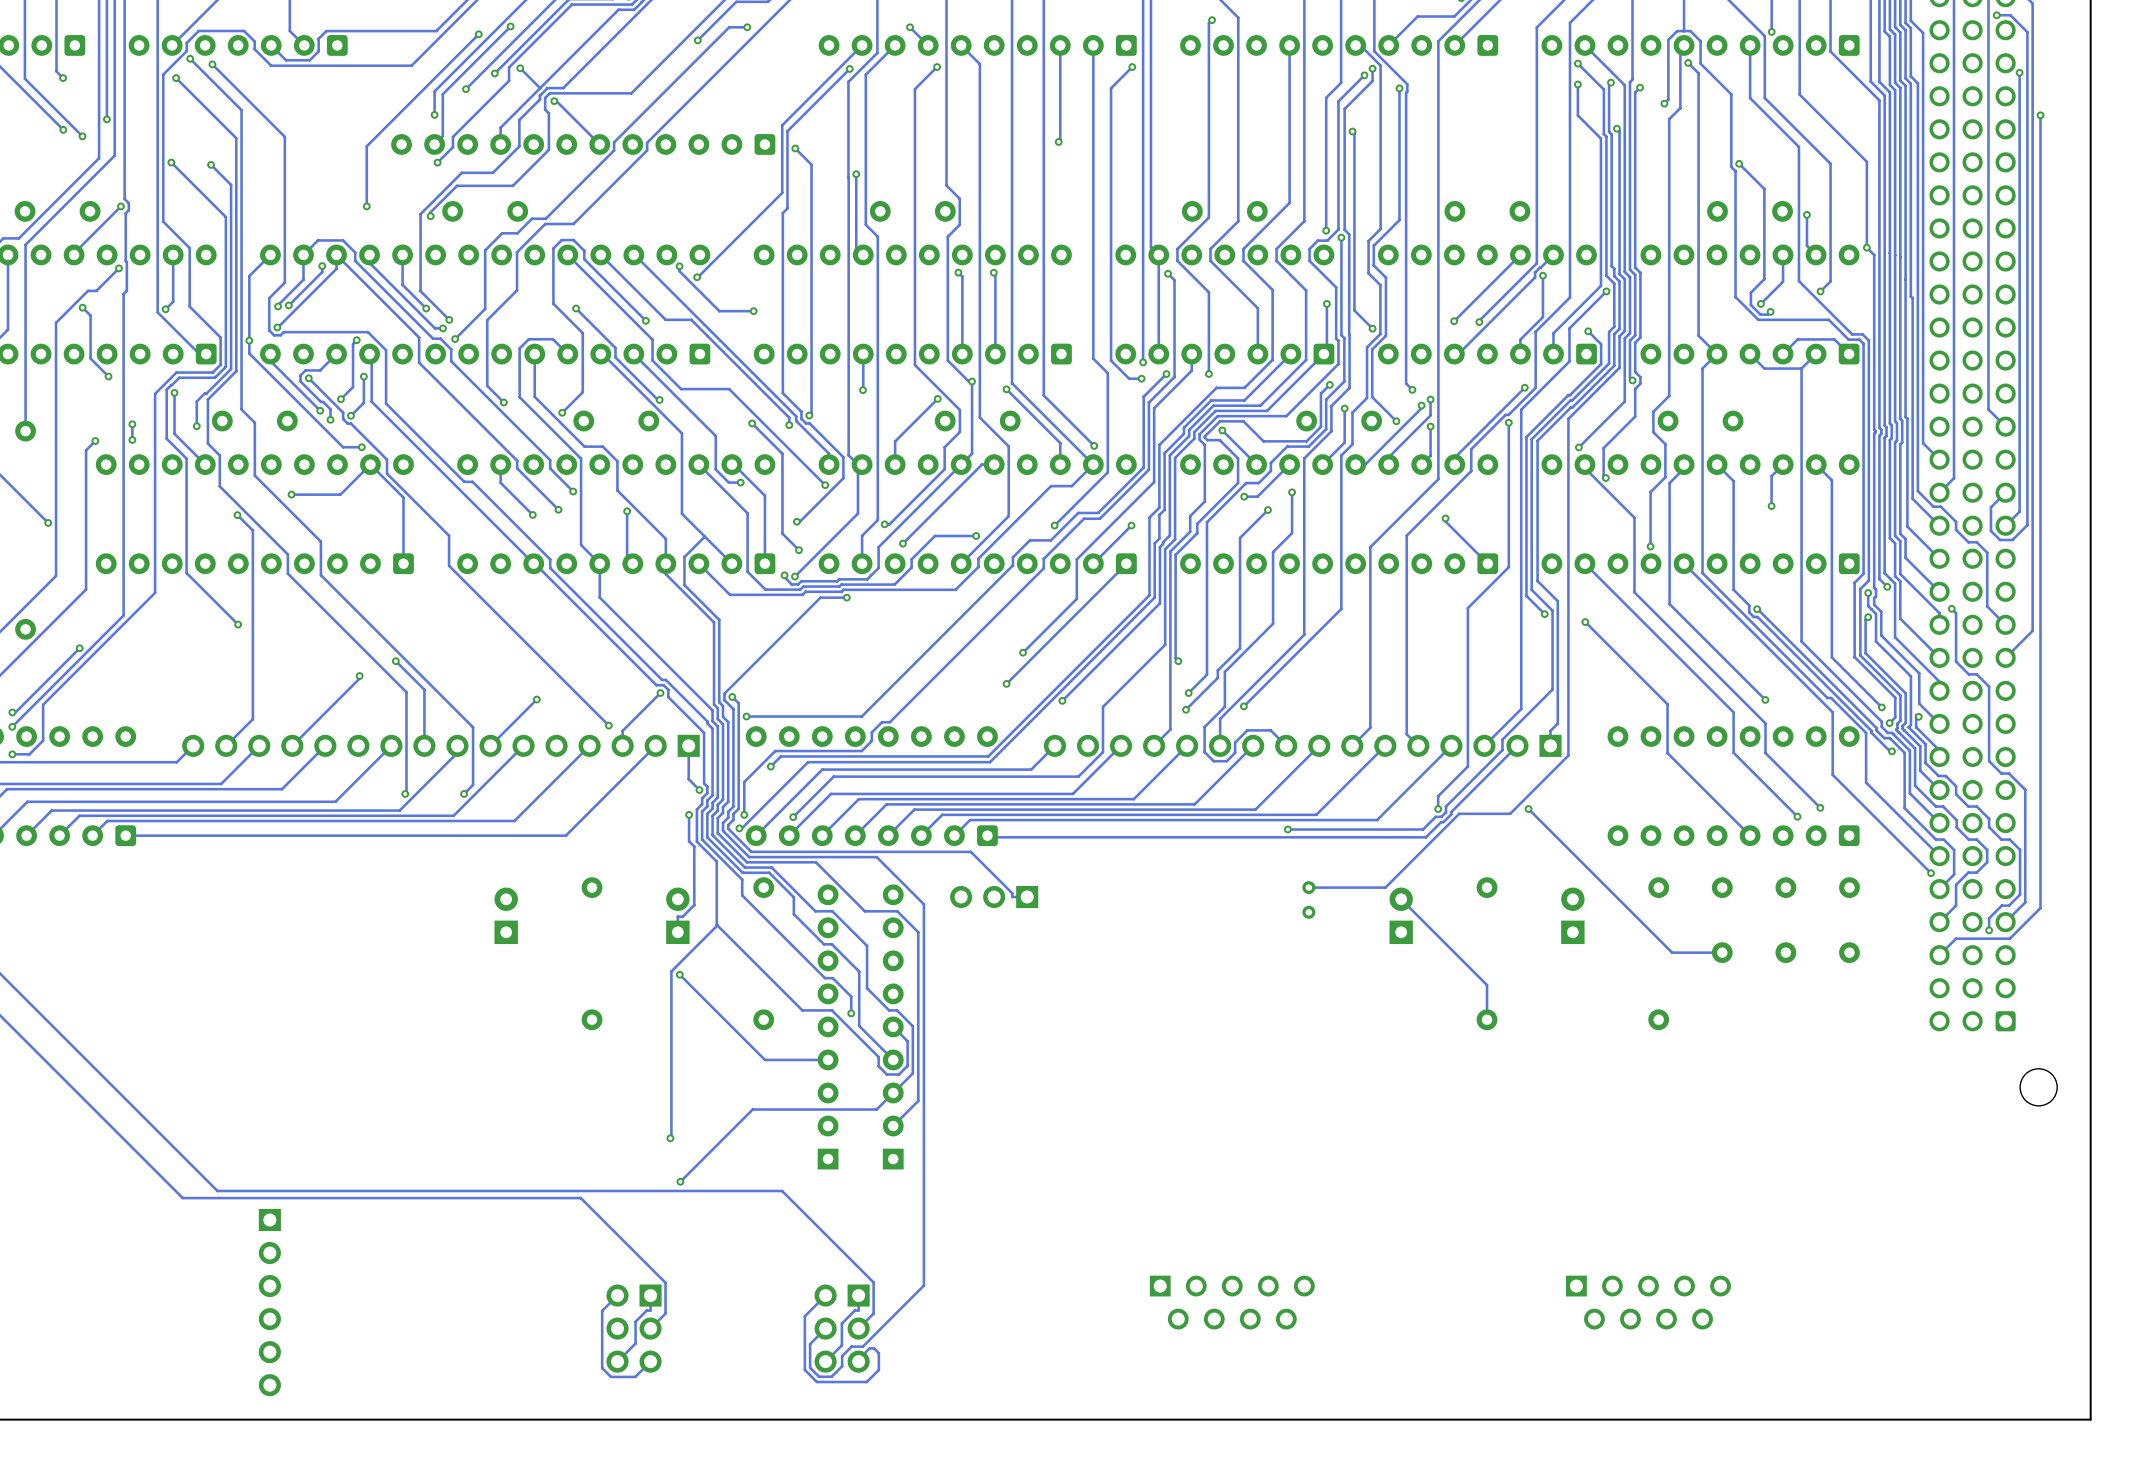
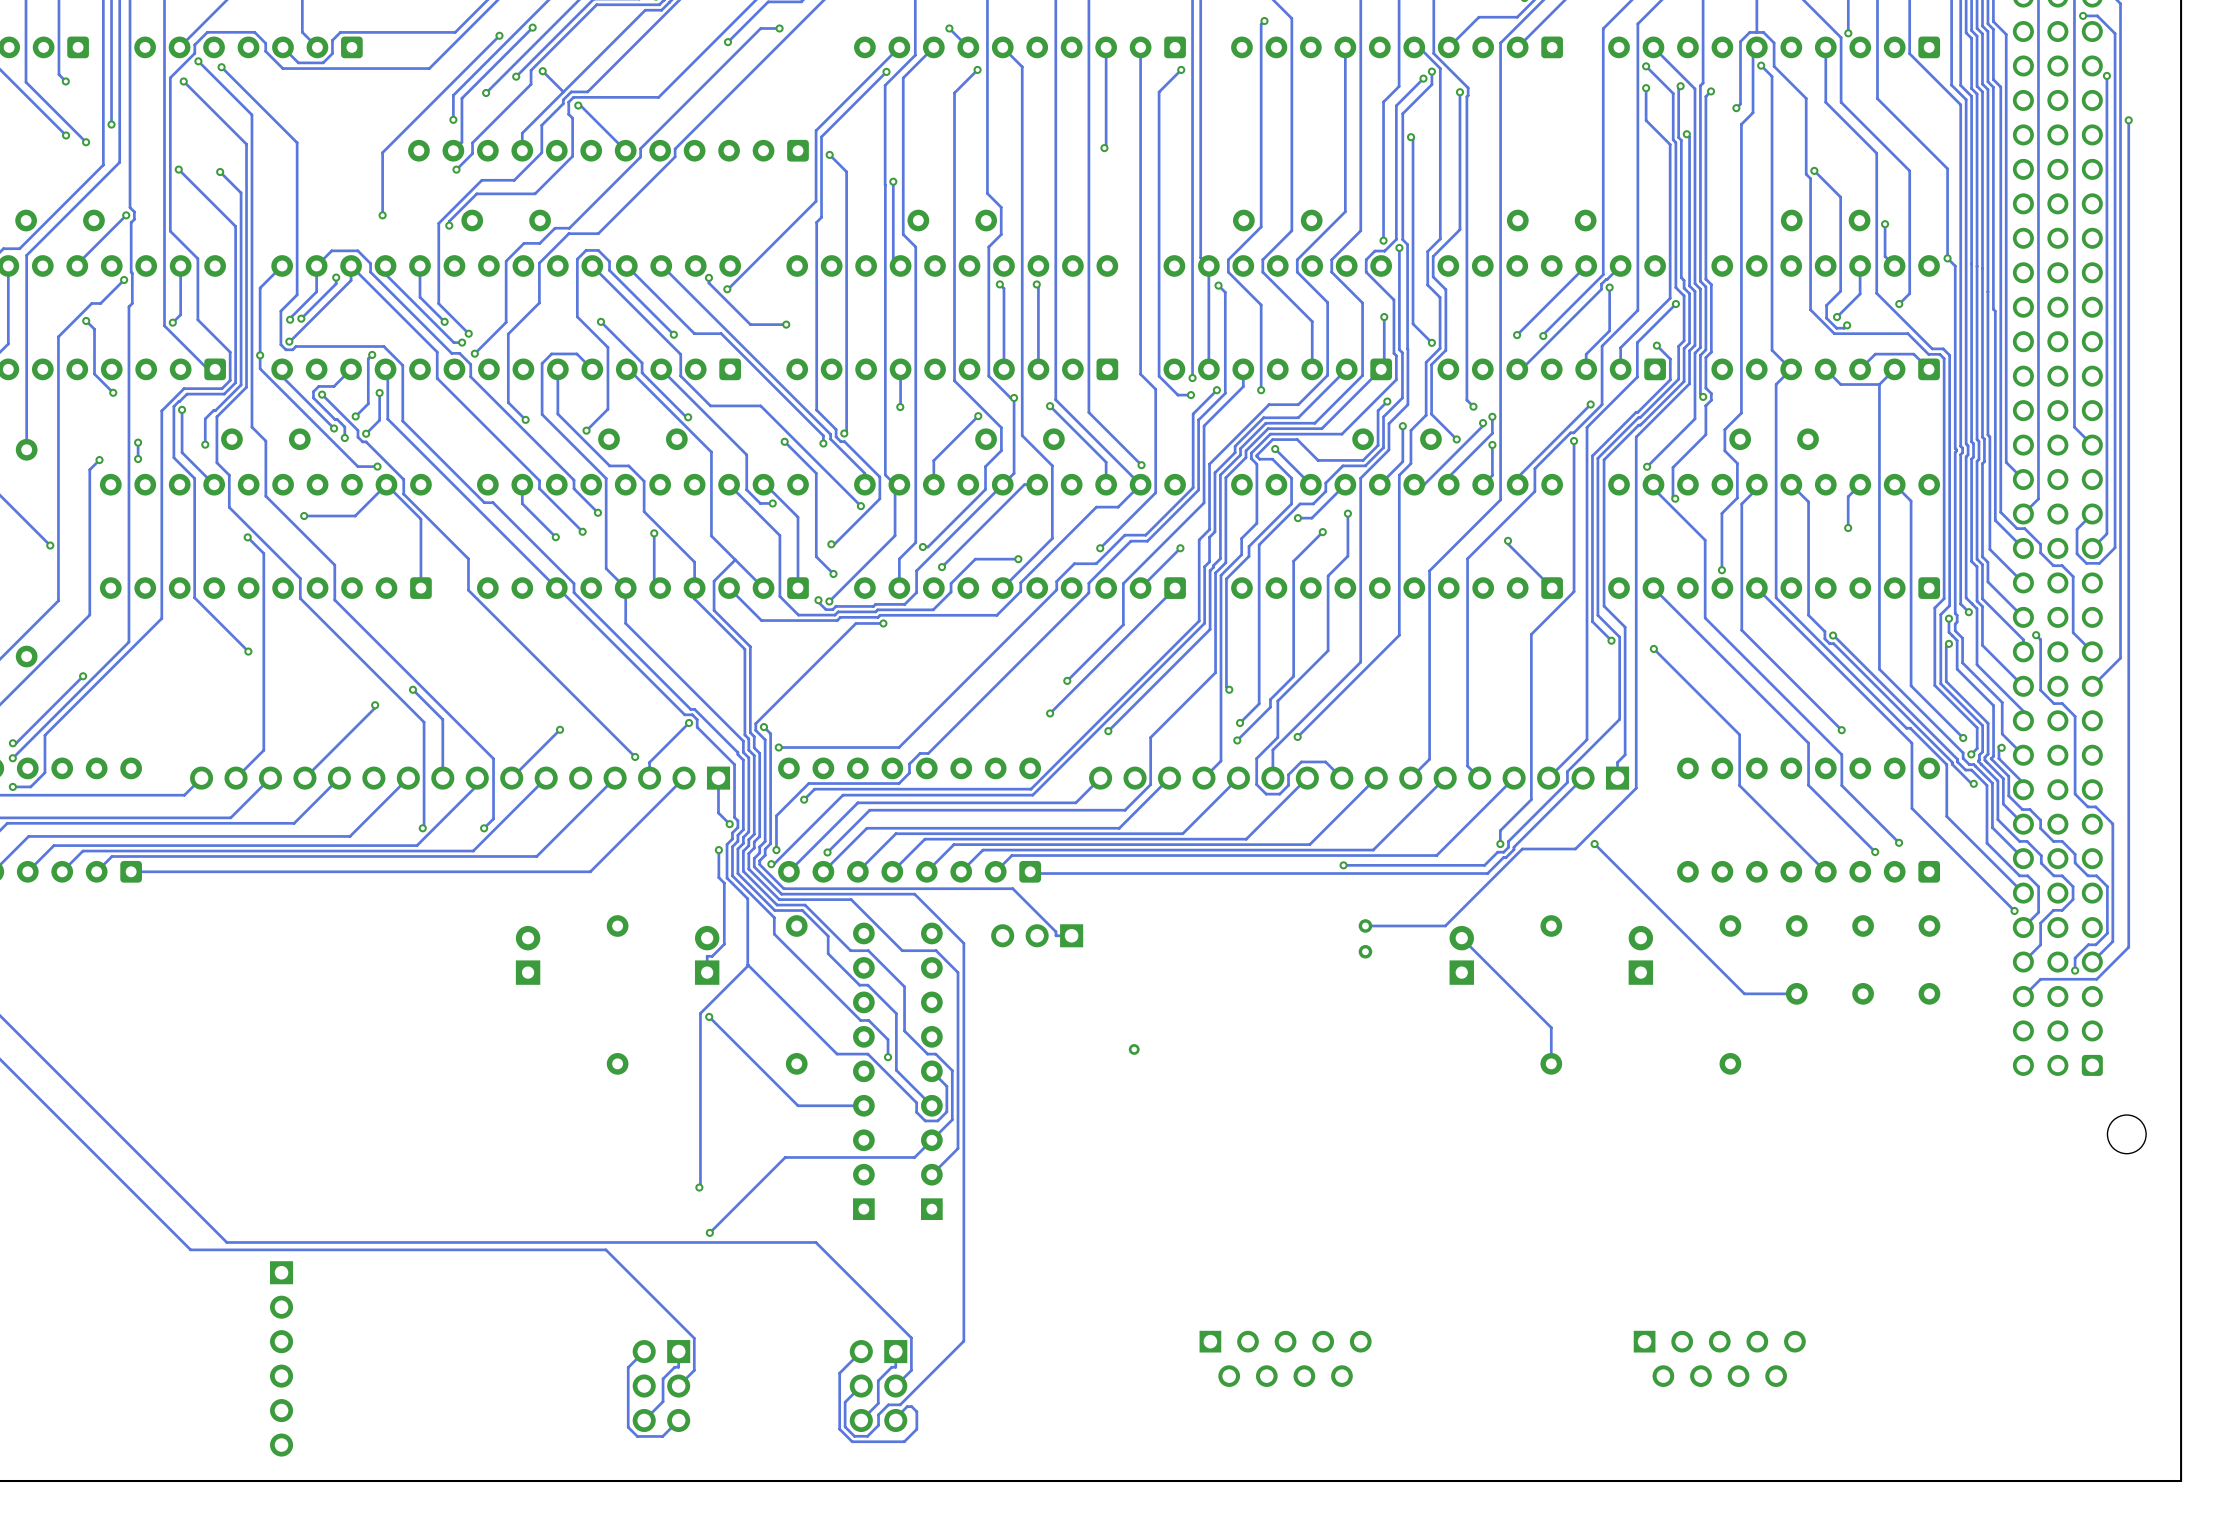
via: none -> (1134, 1049)

